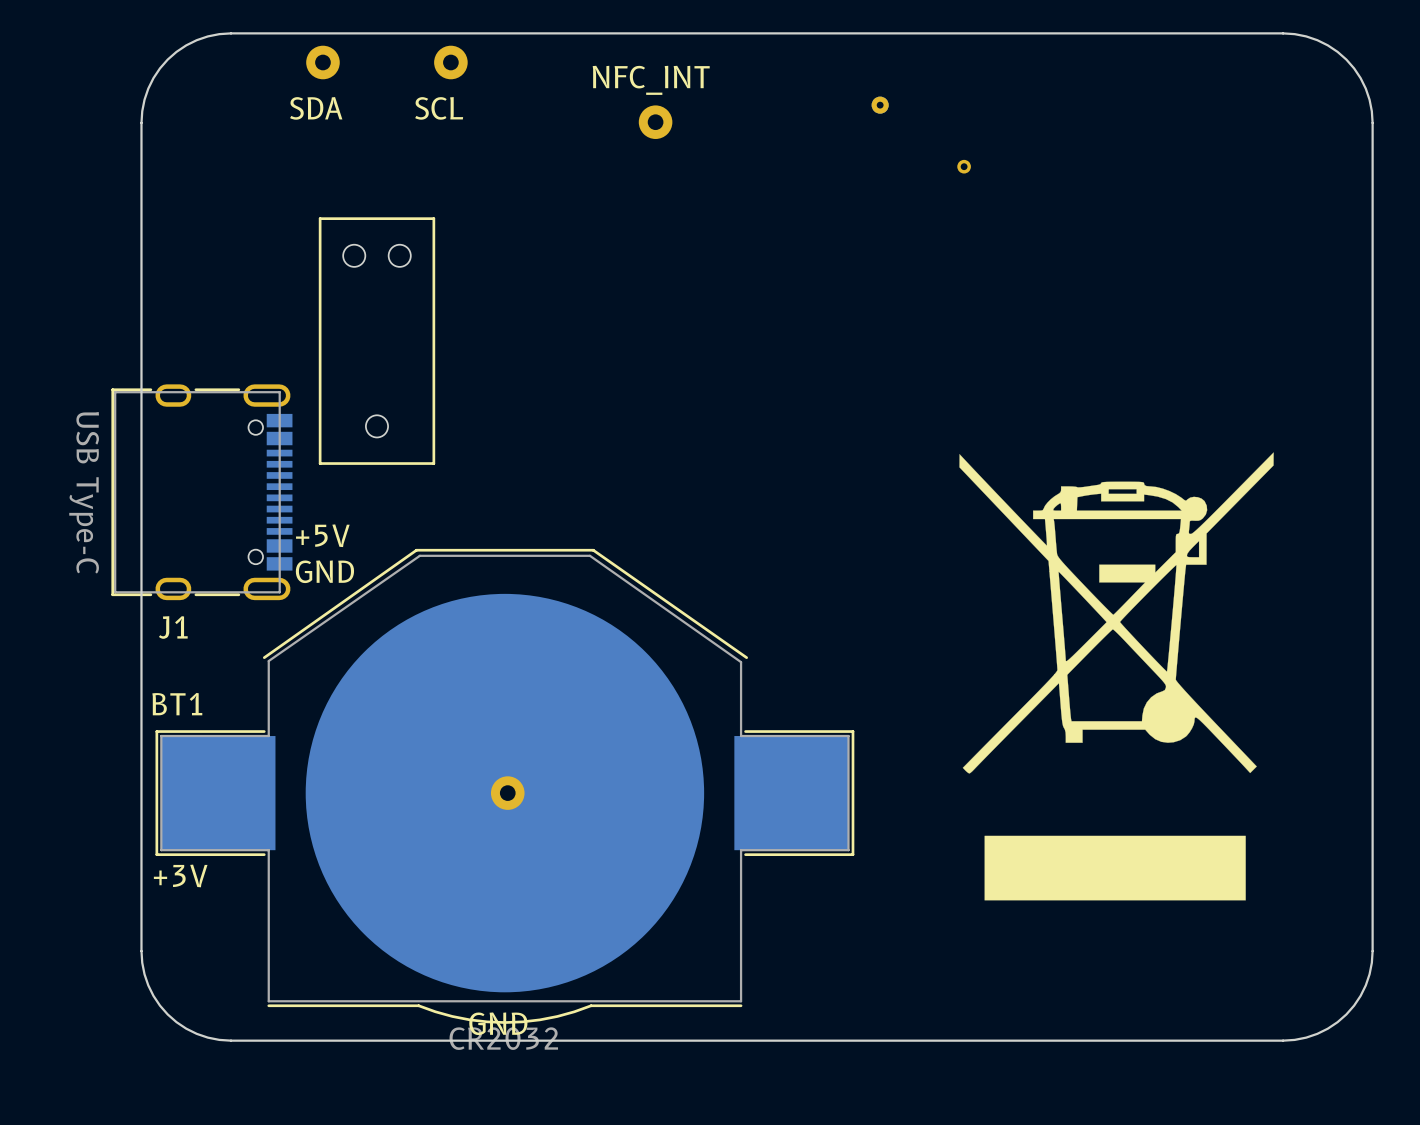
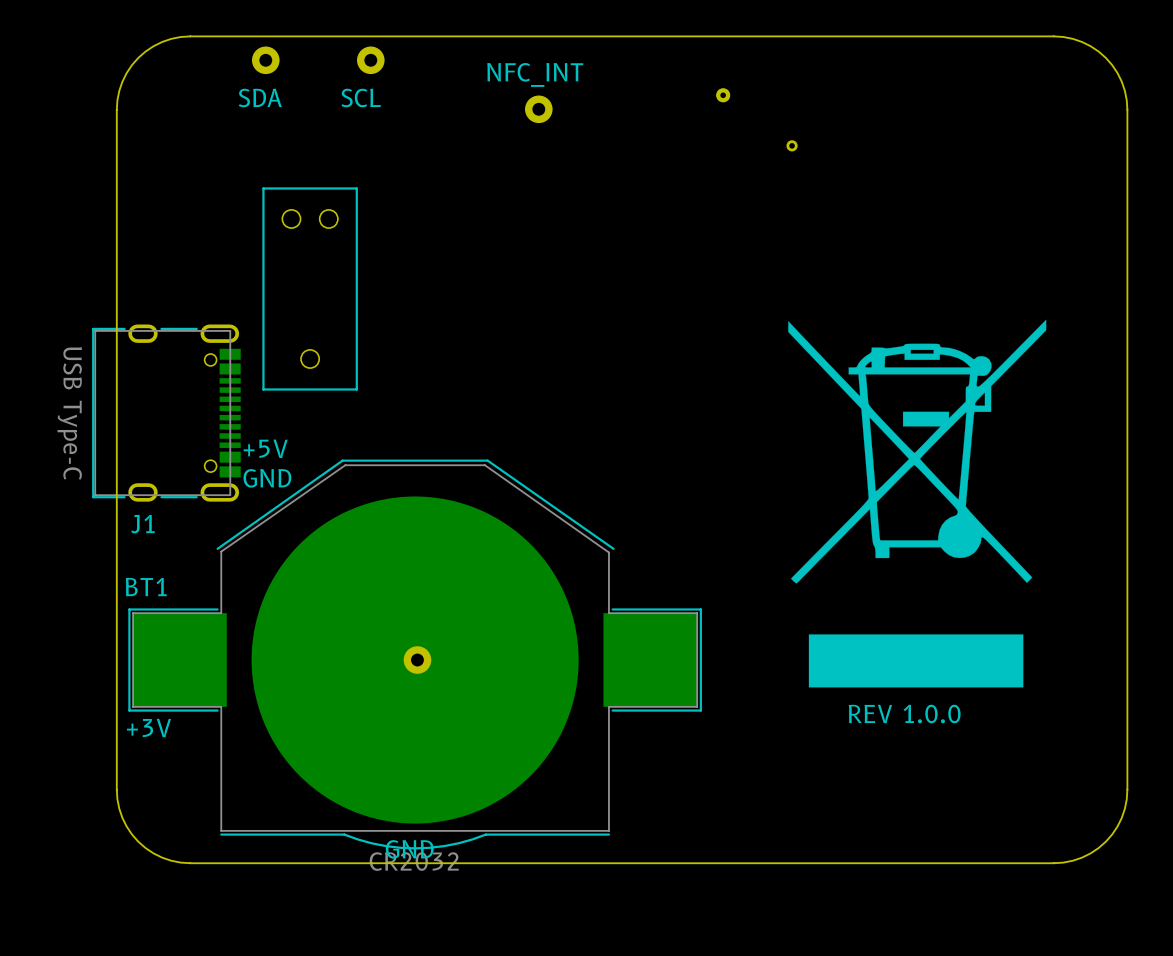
drawing position: (1116, 676) -> (917, 503)
text: none -> REV 1.0.0 (904, 713)

